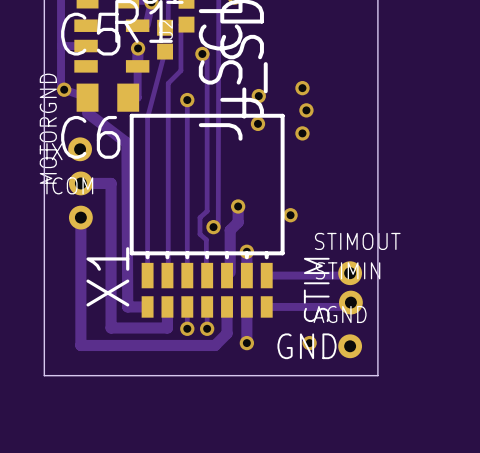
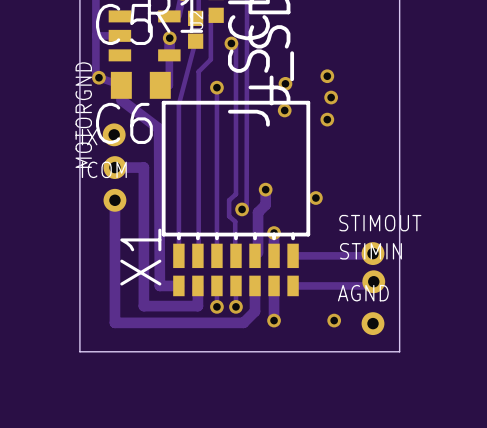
text: STIM (316, 289) -> none
text: GND (307, 346) -> none

